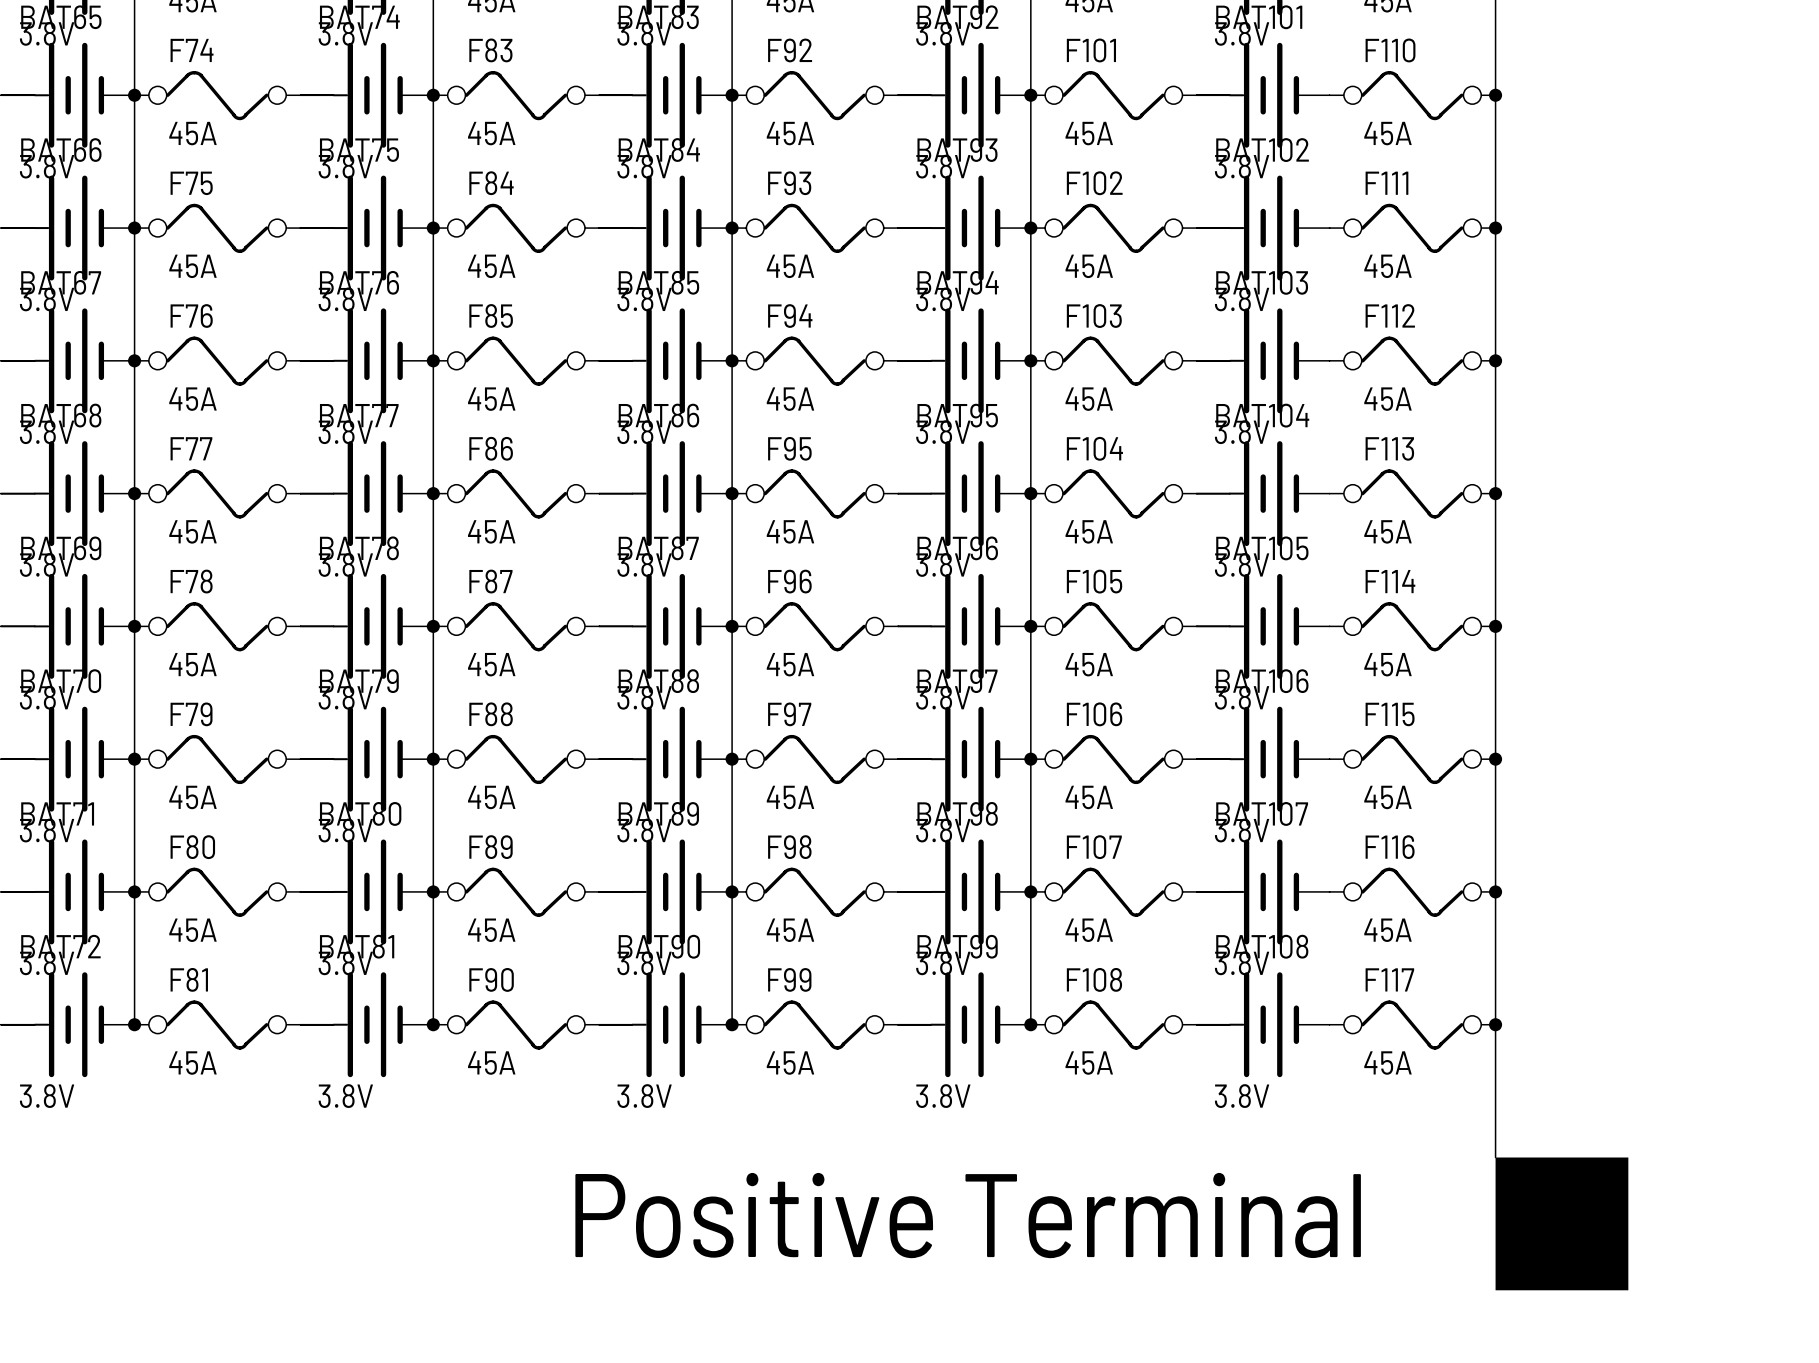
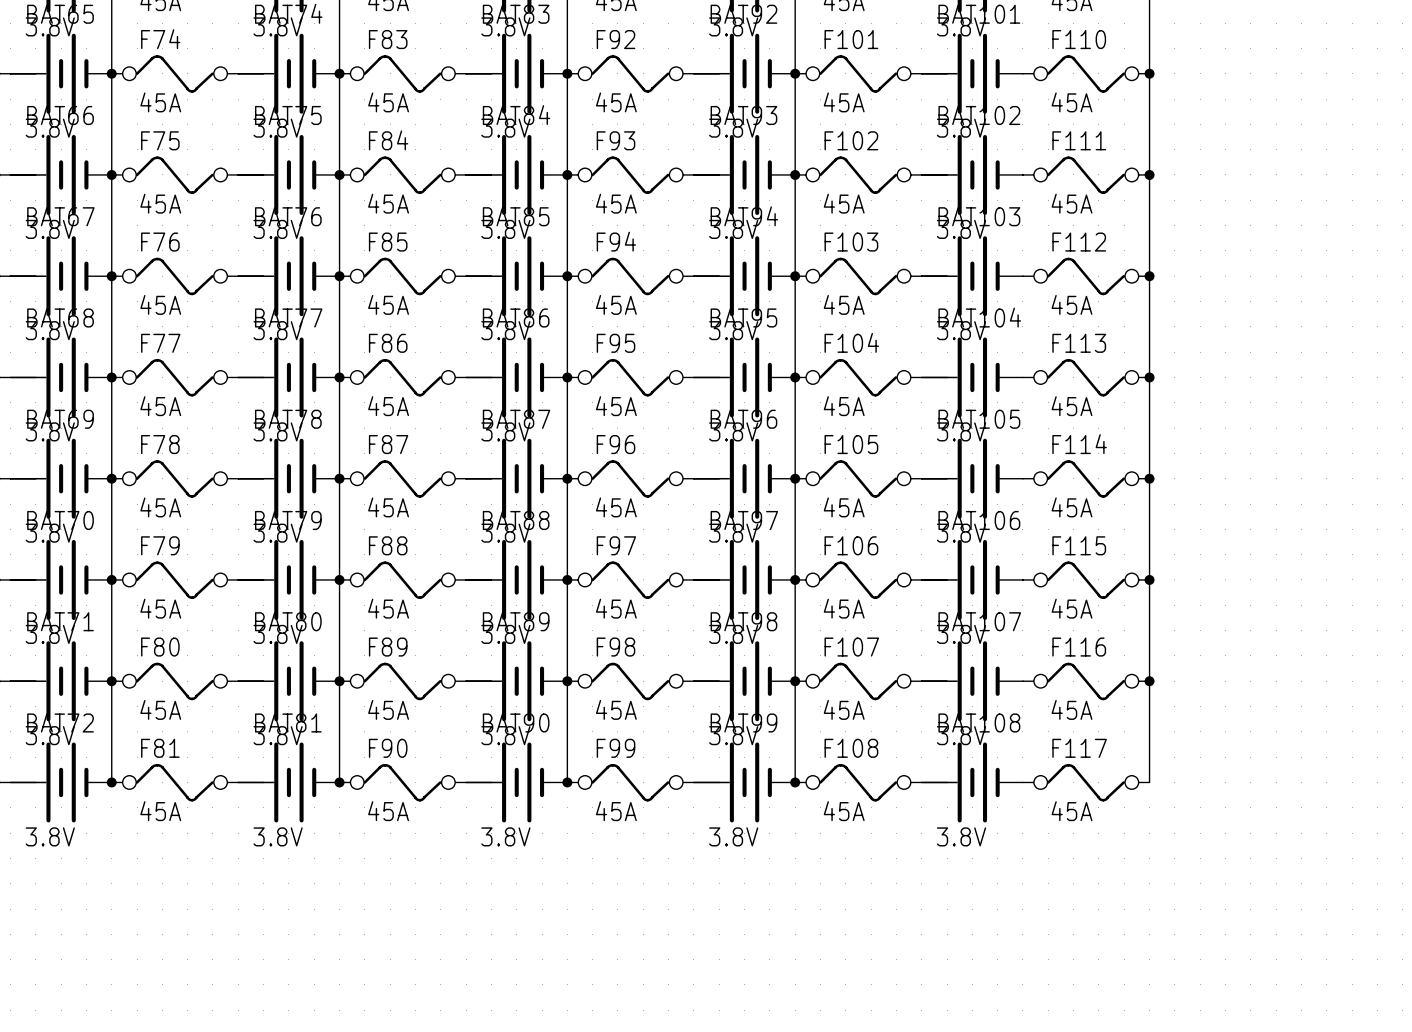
wire: (1495, 1024) (1495, 1157) -> none
junction: (1495, 1024) -> none
drawing: [1495, 1157, 1629, 1291] -> none
text: Positive Terminal (968, 1215) -> none

